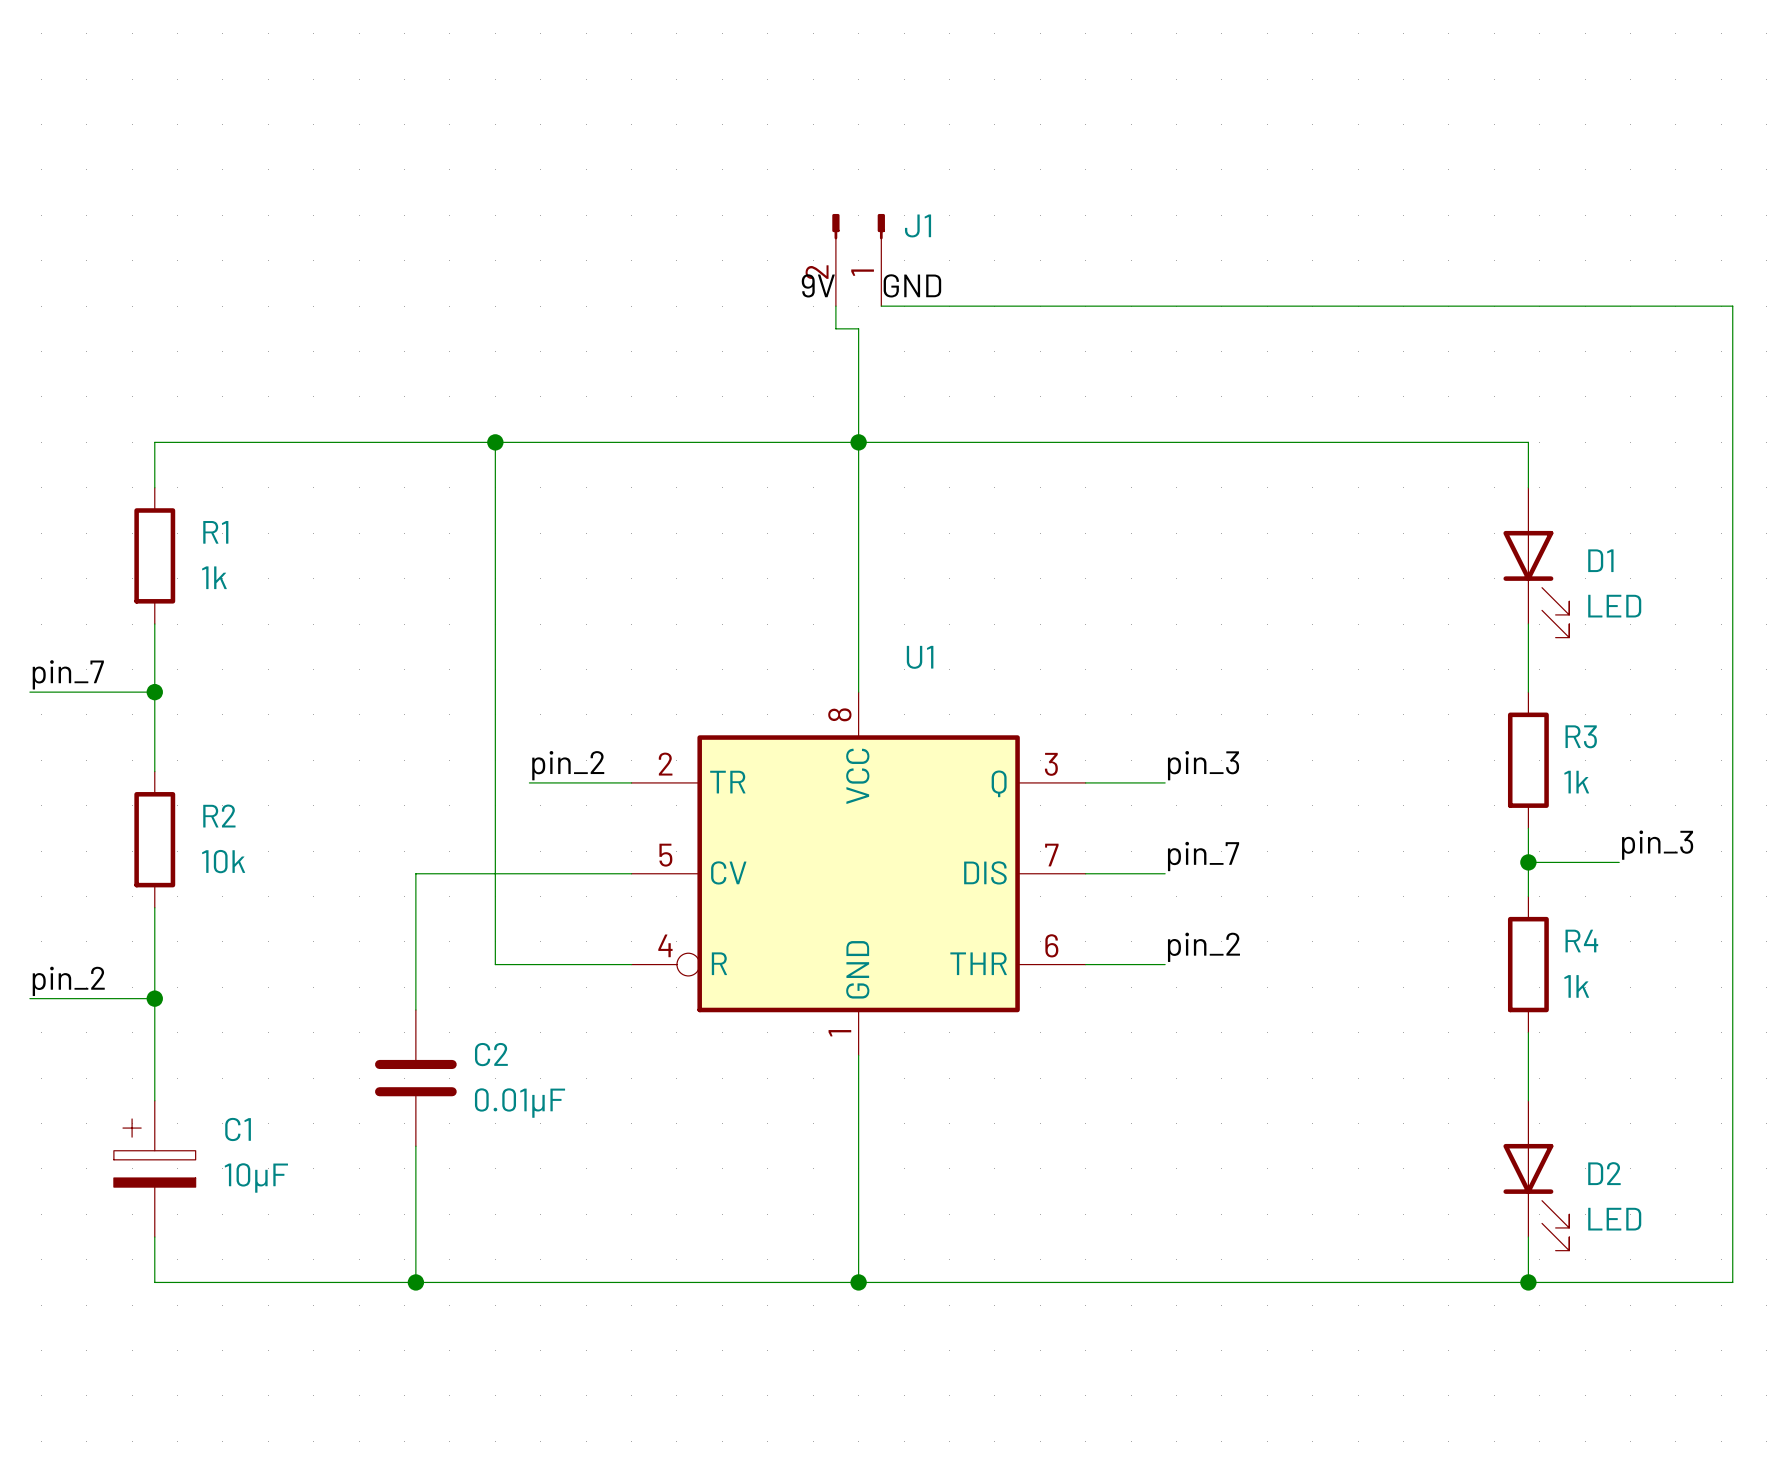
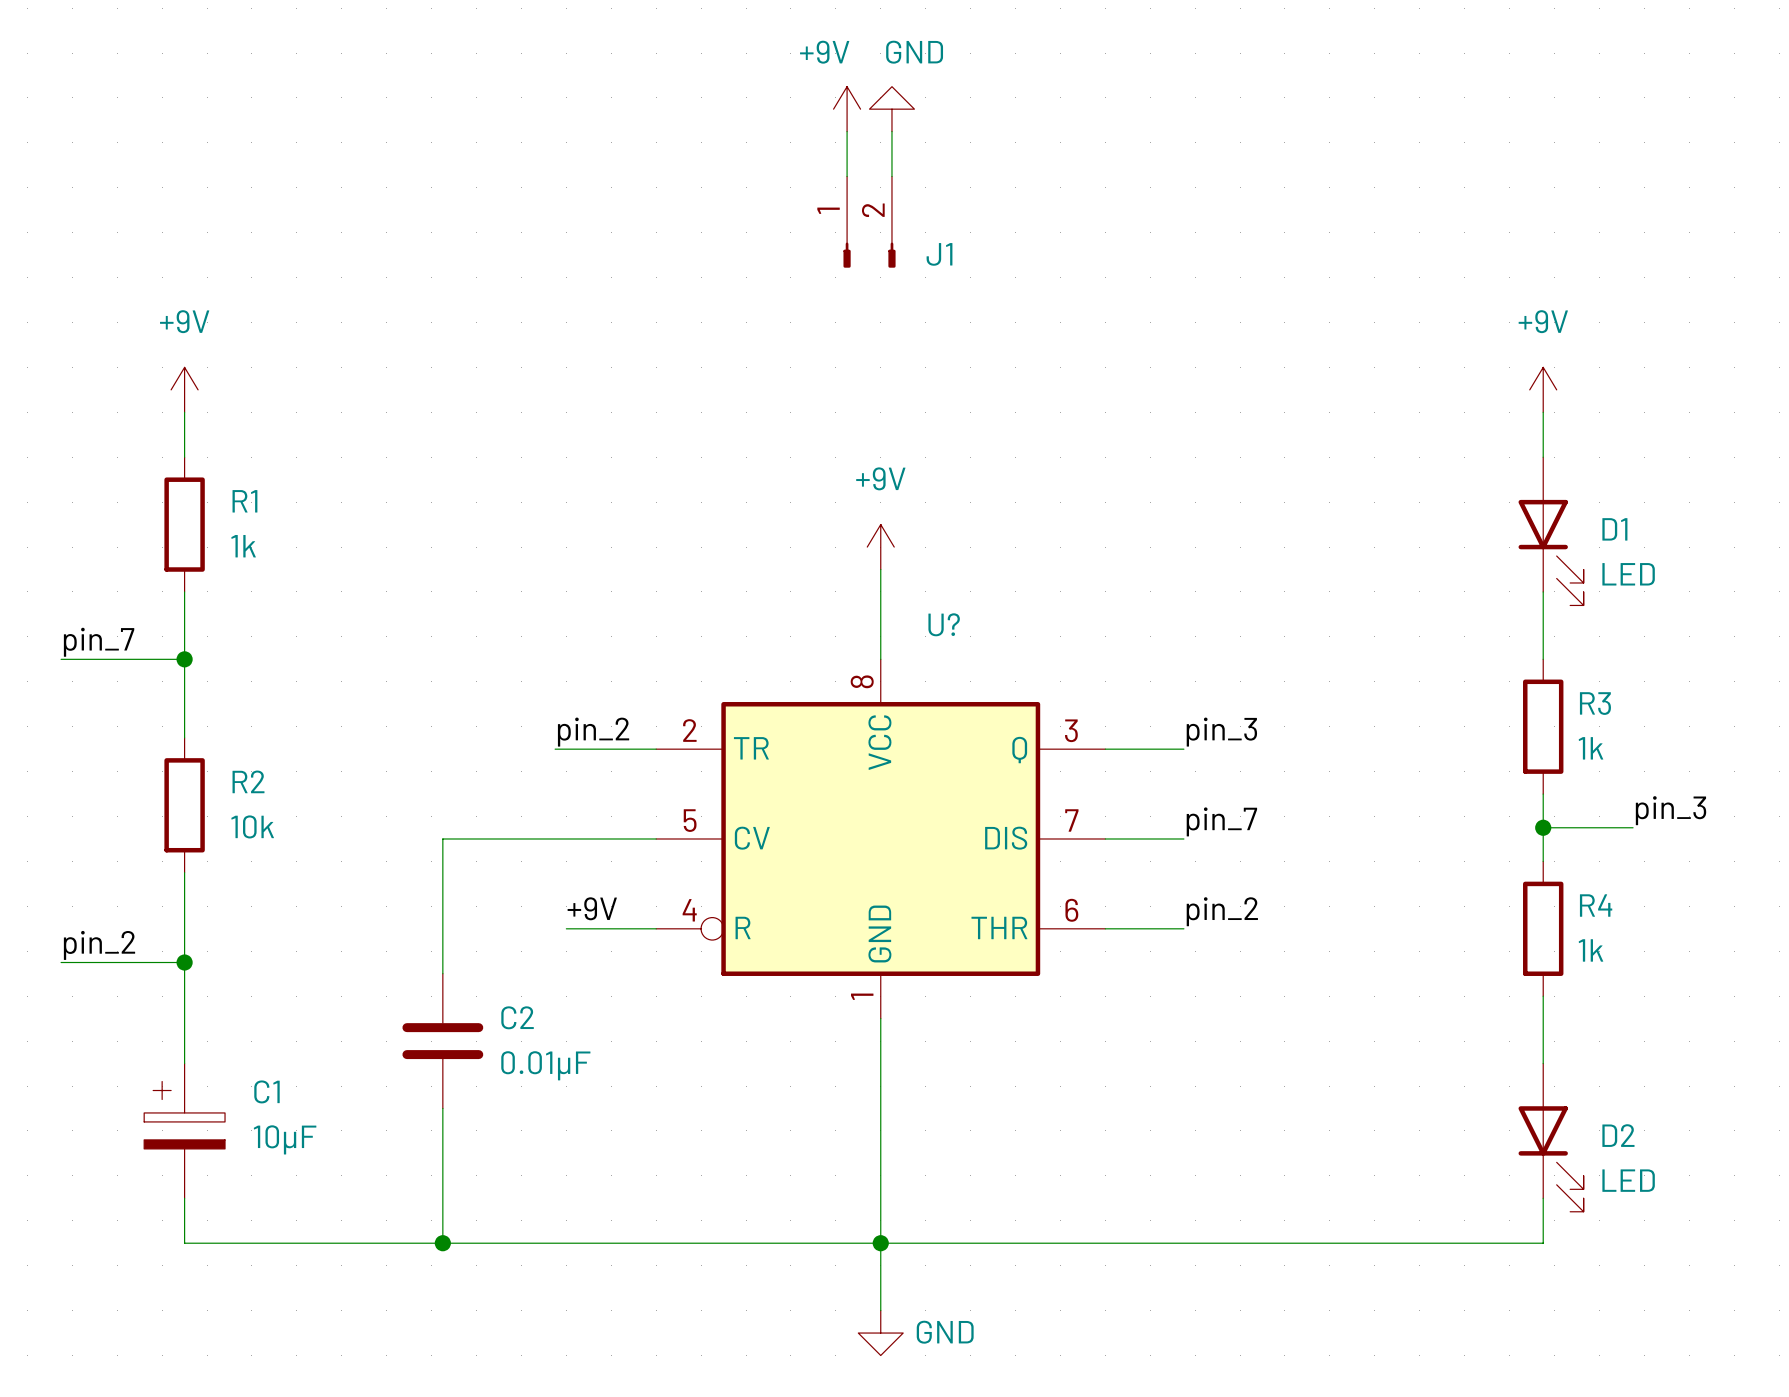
power symbol: none -> +9V (847, 109)
power symbol: none -> GND (891, 109)
wire: none -> (847, 131) (847, 176)
wire: none -> (891, 131) (891, 176)
J1 name position: J1 (918, 225) -> J1 (939, 254)
J1 rotation: 0° (858, 226) -> 180° (869, 255)
label: 9V (818, 285) -> none
label: GND (912, 285) -> none
wire: (835, 306) (835, 328) (858, 328) (858, 601) -> none
wire: (881, 306) (1732, 306) (1732, 1282) (1528, 1282) -> none
power symbol: none -> +9V (184, 389)
power symbol: none -> +9V (1543, 389)
wire: (154, 442) (1528, 442) -> none
wire: (495, 442) (495, 964) (540, 964) -> none
junction: (495, 442) -> none
junction: (858, 442) -> none
power symbol: none -> +9V (880, 547)
U1 name: U1 (920, 657) -> U? (944, 624)
label: none -> +9V (592, 908)
wire: none -> (880, 1243) (880, 1310)
junction: (1528, 1282) -> none
power symbol: none -> GND (880, 1333)

